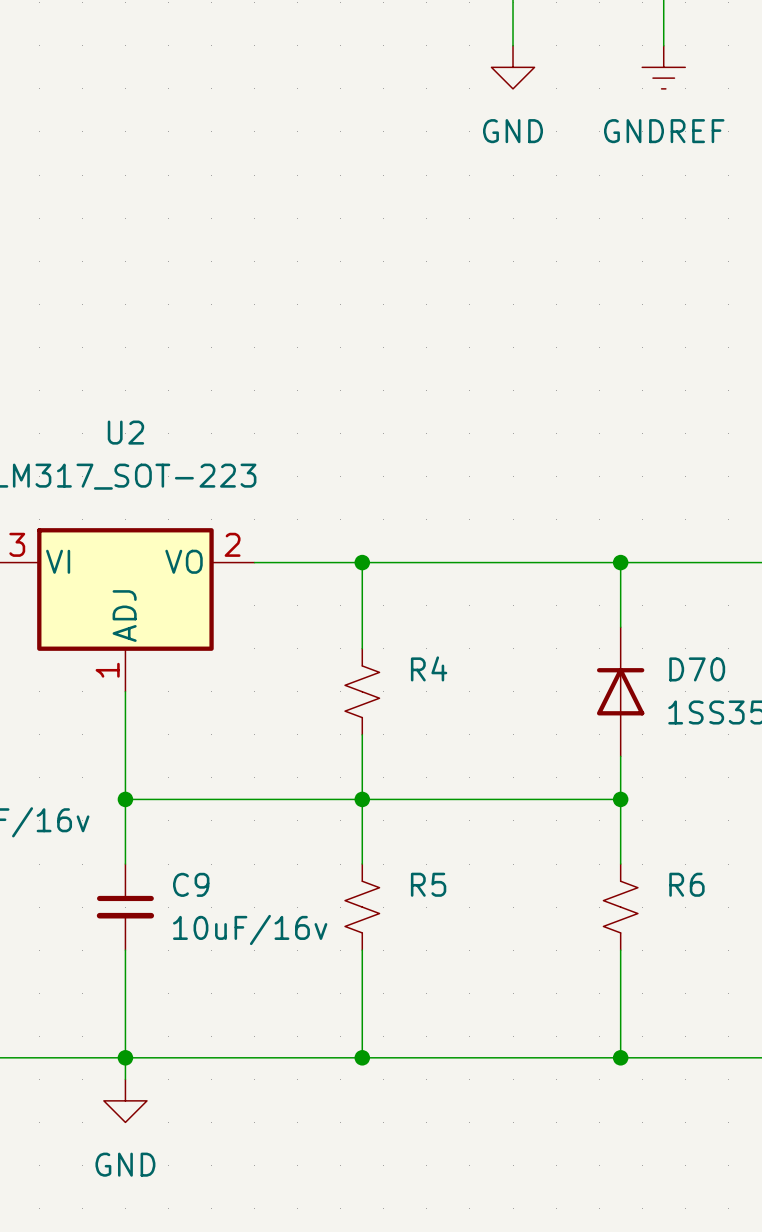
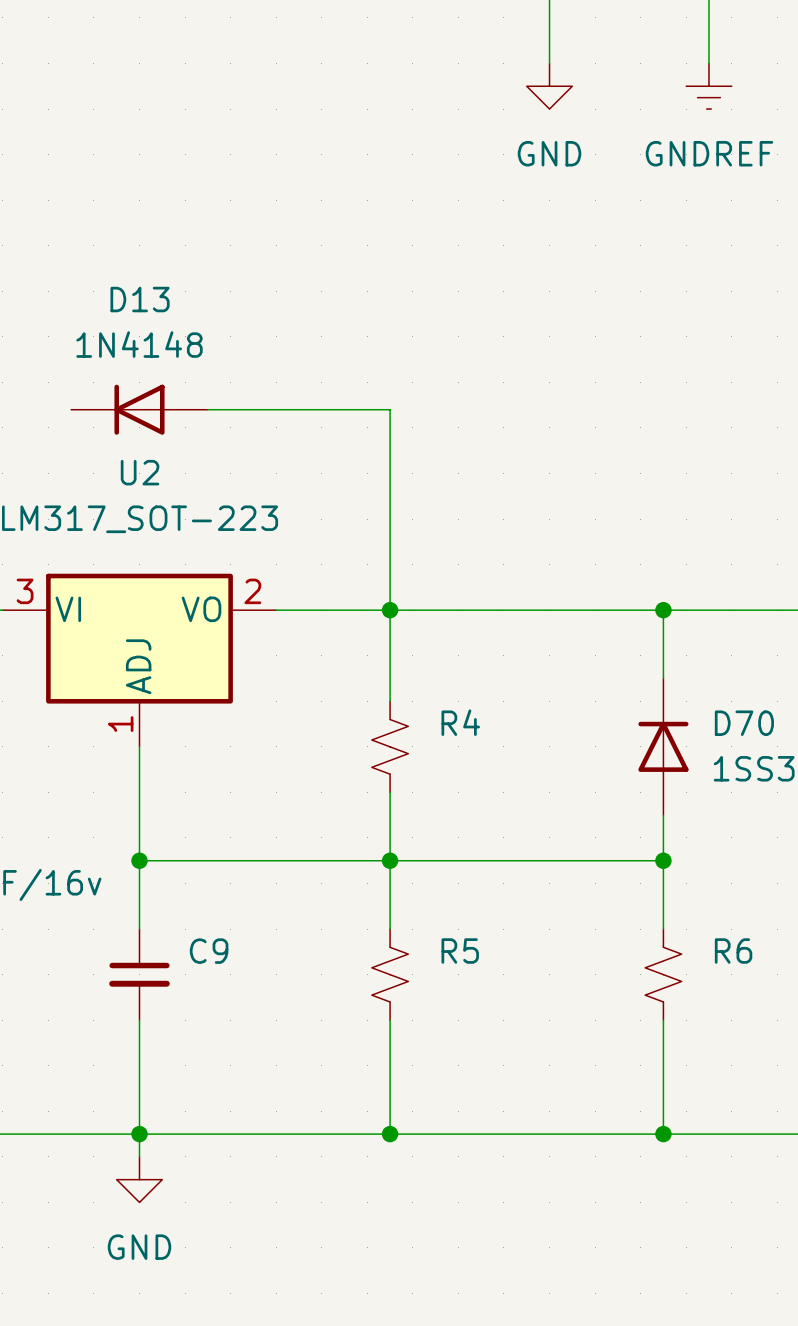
D13: none -> 1N4148 (139, 409)
wire: none -> (207, 409) (390, 409) (390, 610)
C9 value: 10uF/16v (250, 929) -> none

